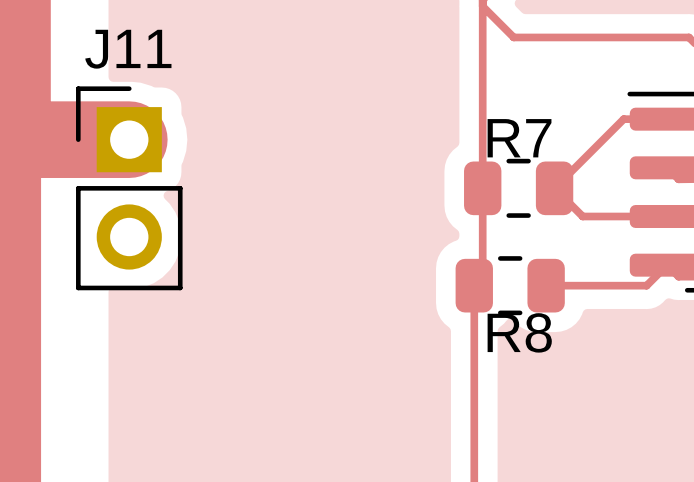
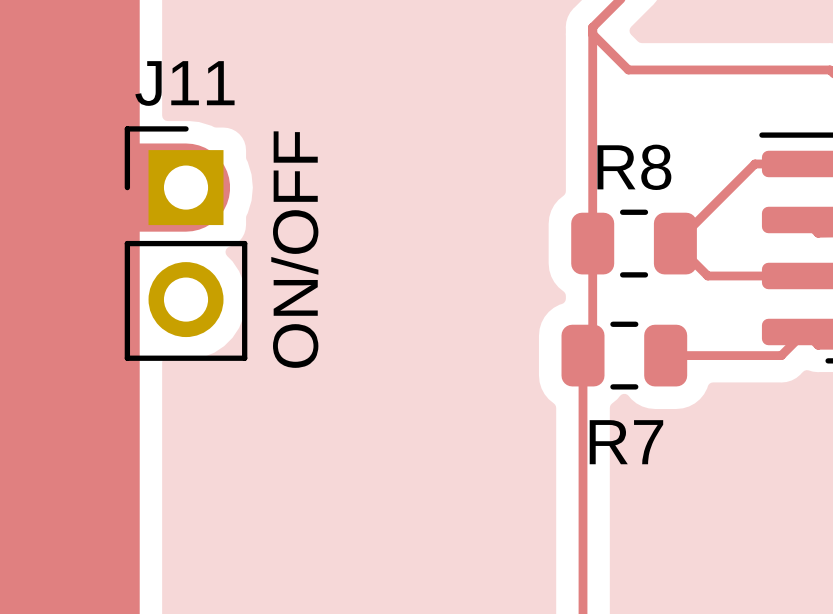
R7 name position: R7 (519, 138) -> R7 (626, 442)
text: none -> ON/OFF (294, 249)
R8 name position: R8 (519, 332) -> R8 (634, 167)

